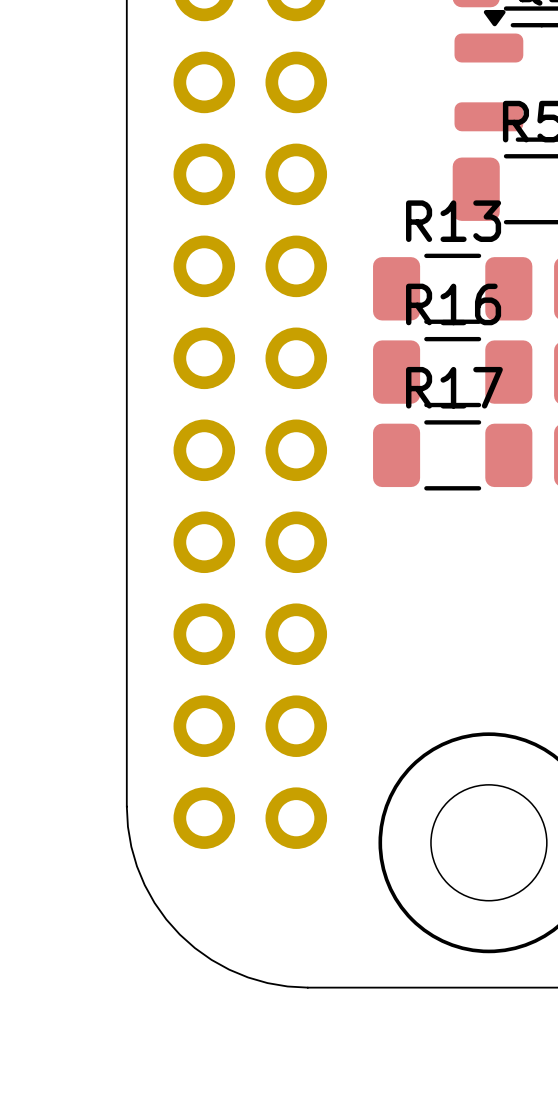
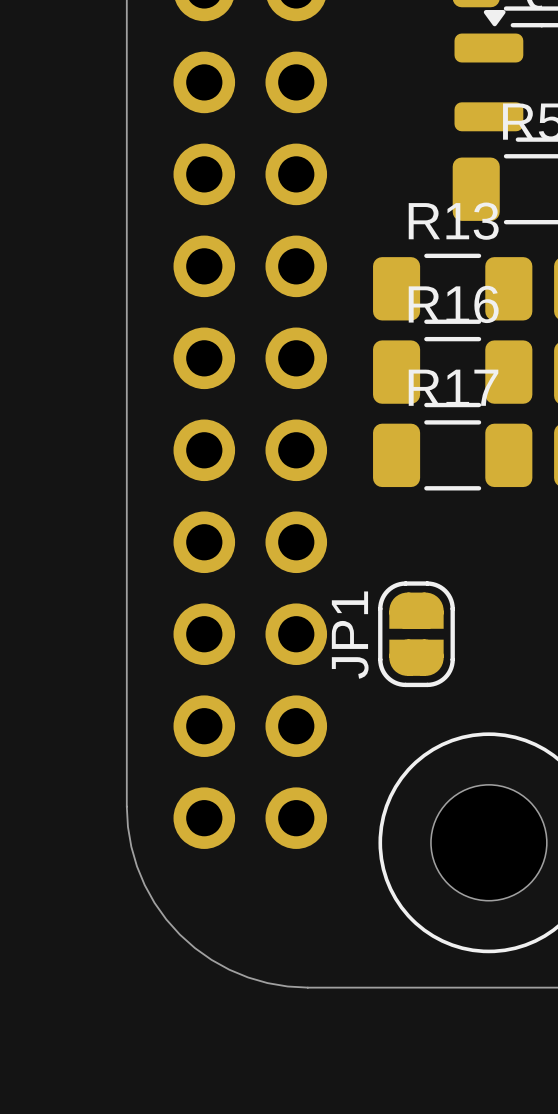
JP1: none -> (416, 634)

